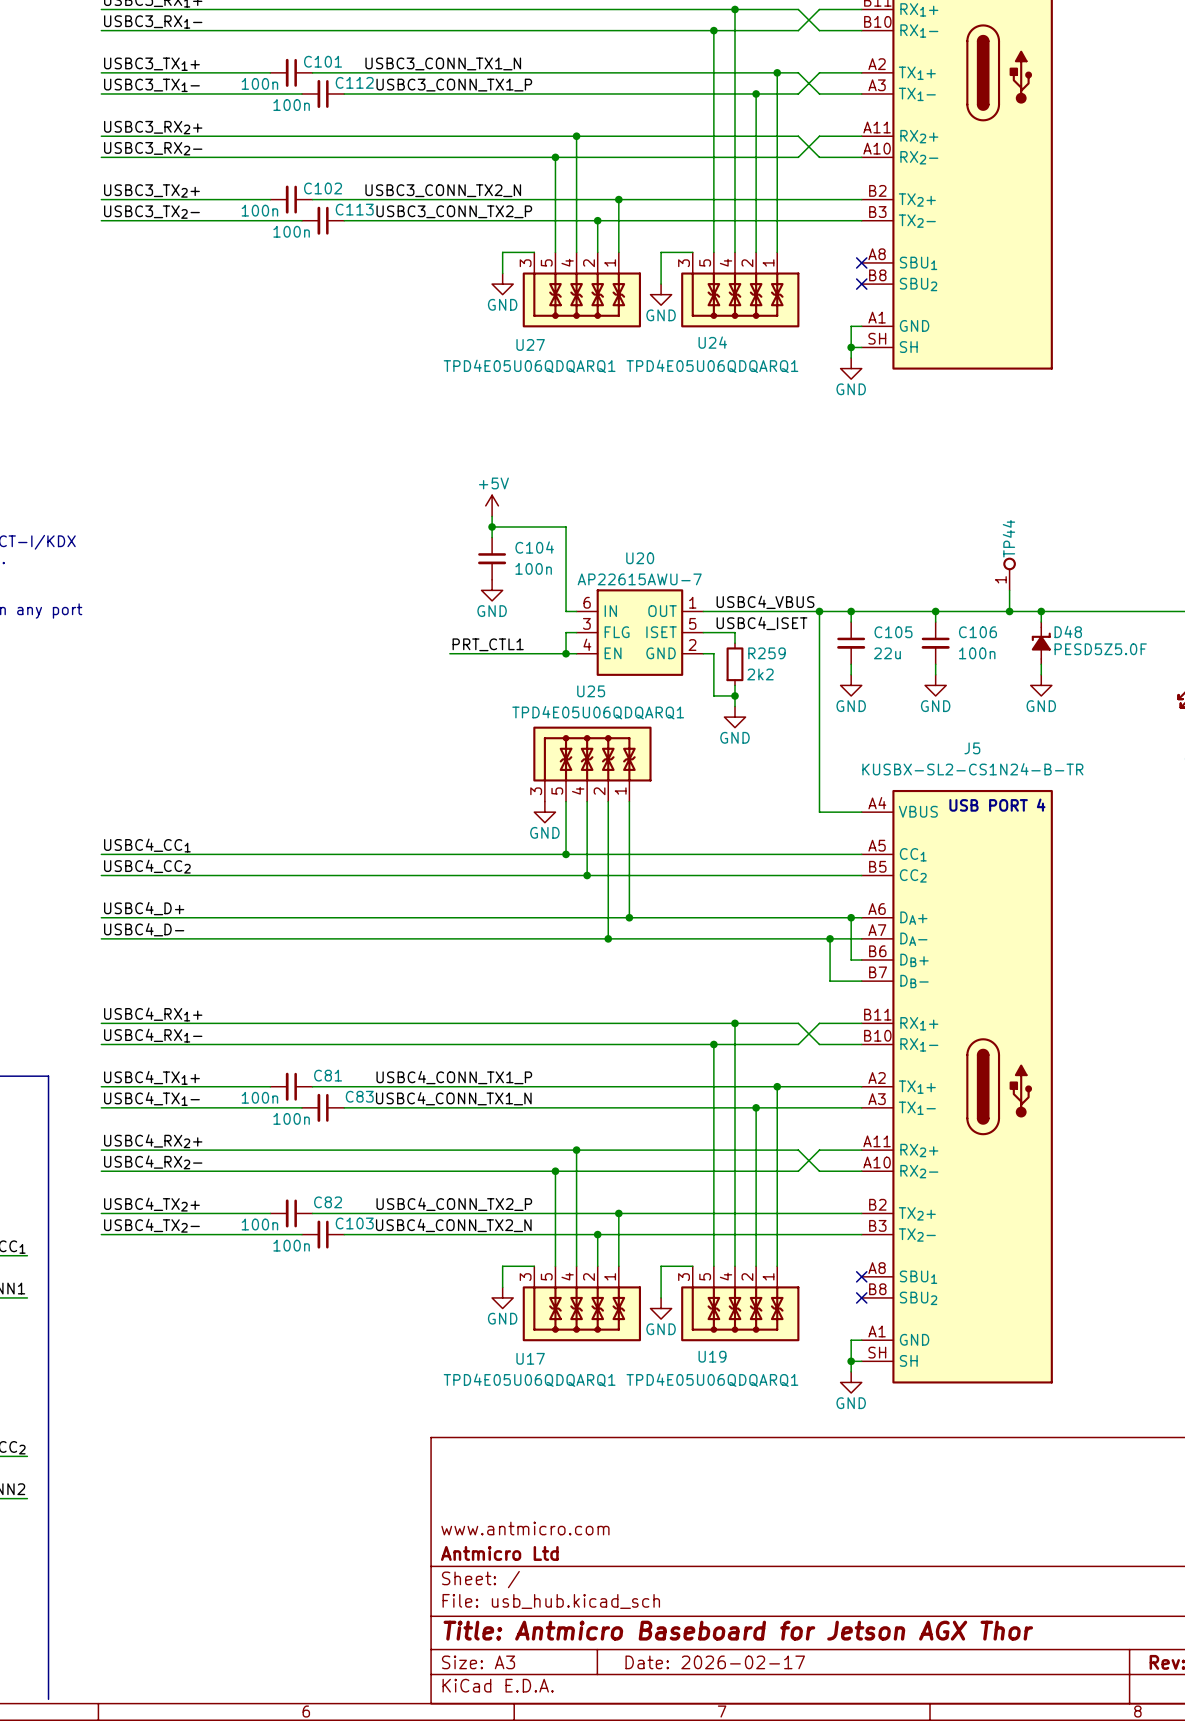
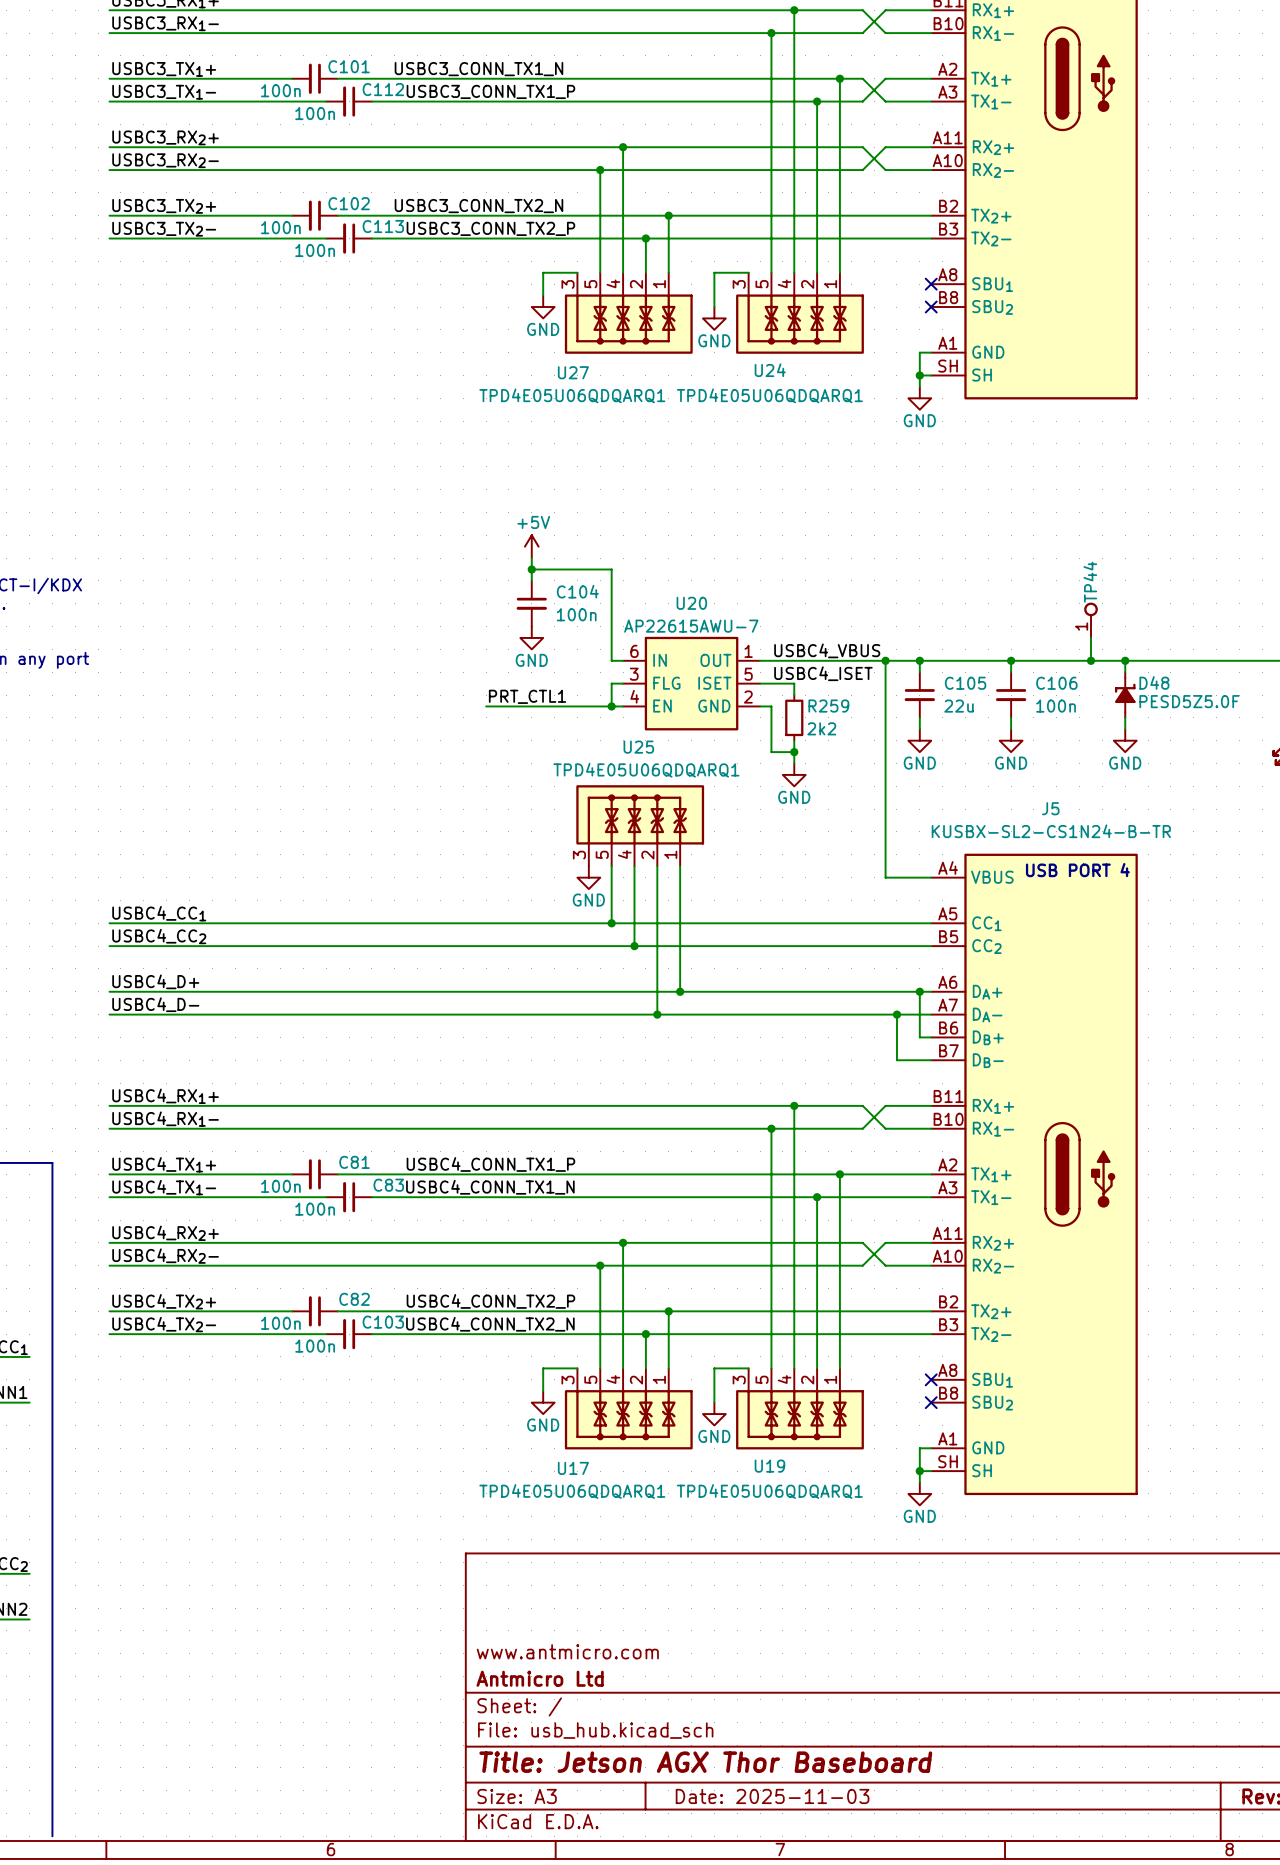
title block: Title: Antmicro Baseboard for Jetson AGX Thor (738, 1630) -> Title: Jetson AGX Thor Baseboard (705, 1762)
title block: Date: 2026-02-17 (715, 1662) -> Date: 2025-11-03 (772, 1796)

